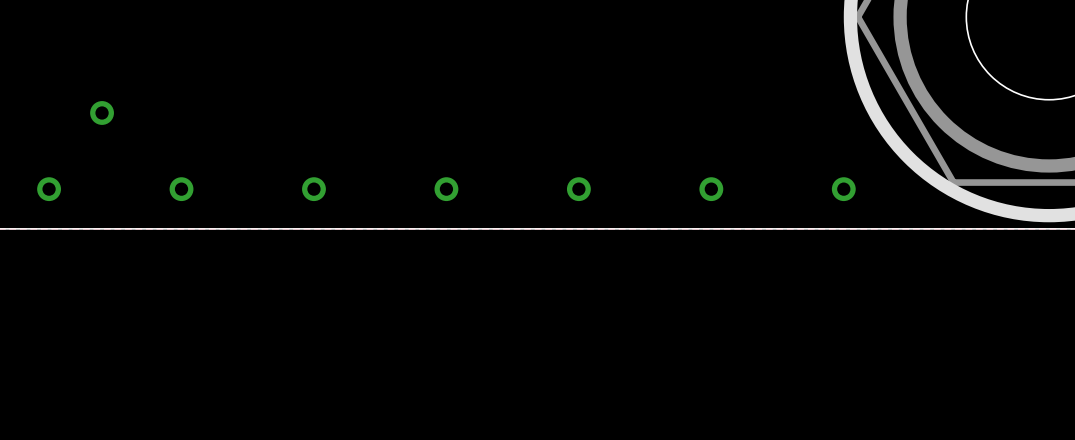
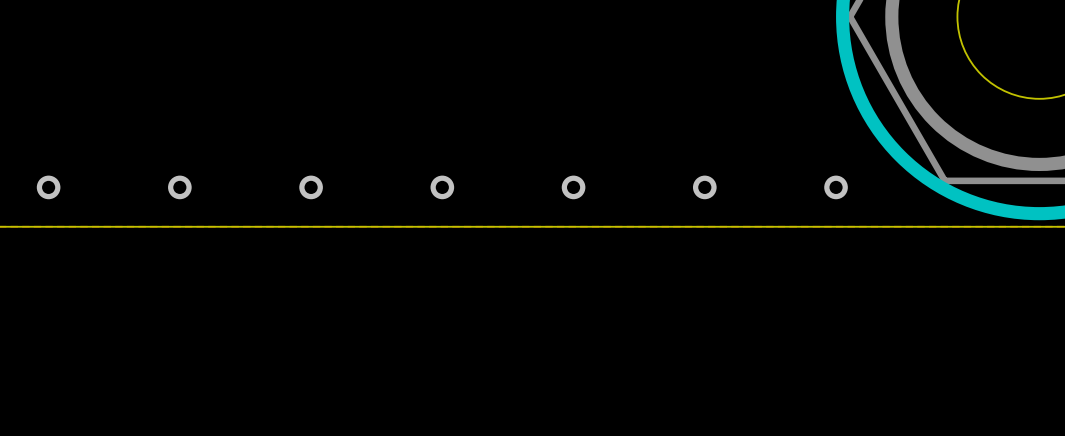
via: (102, 112) -> none

